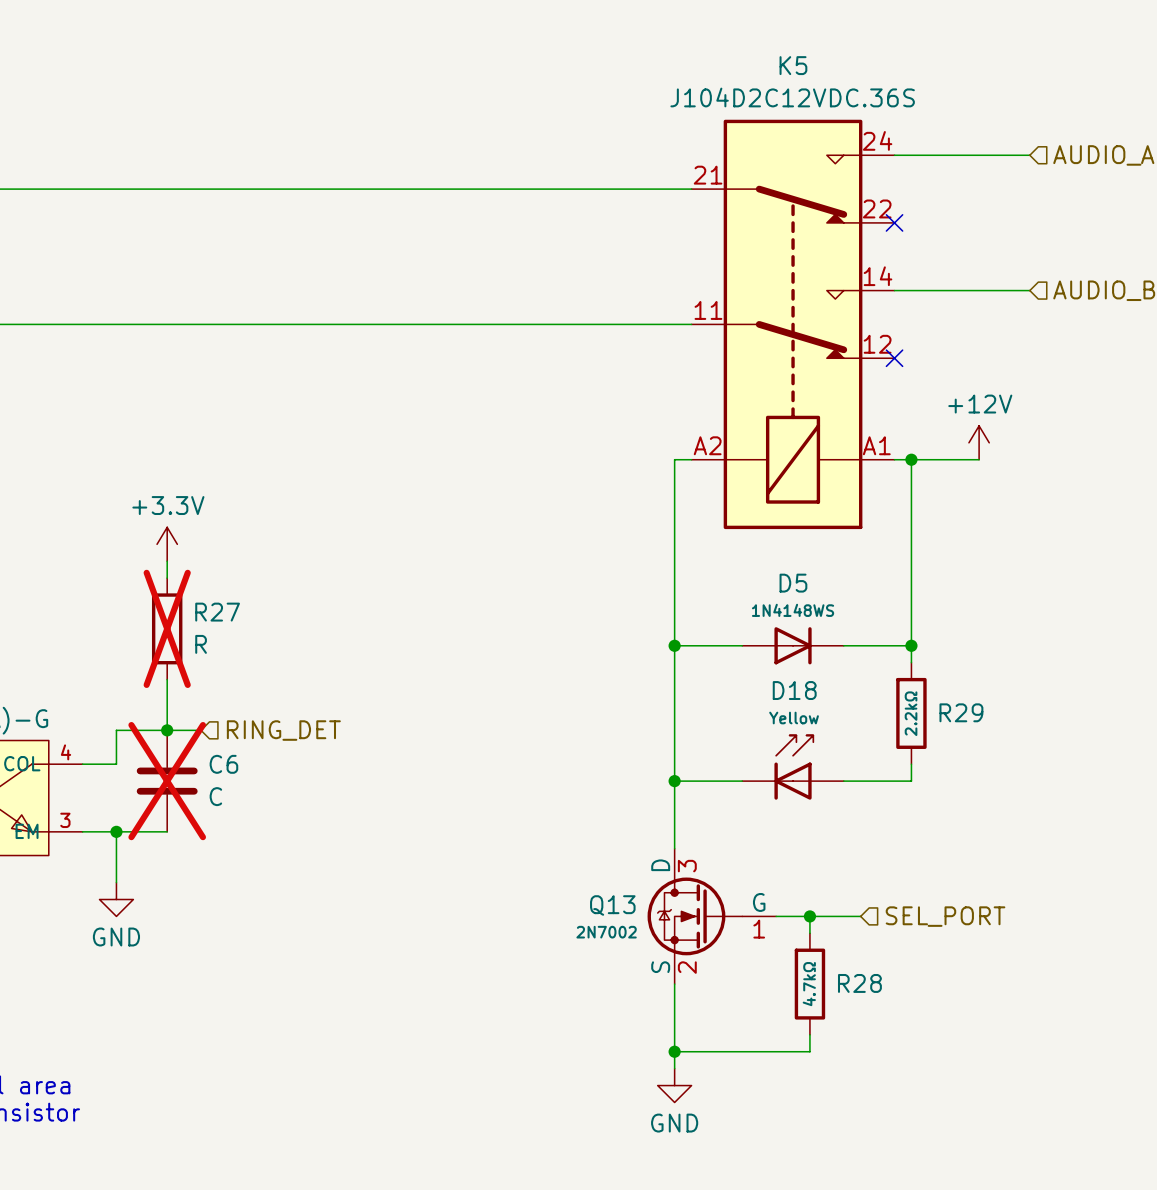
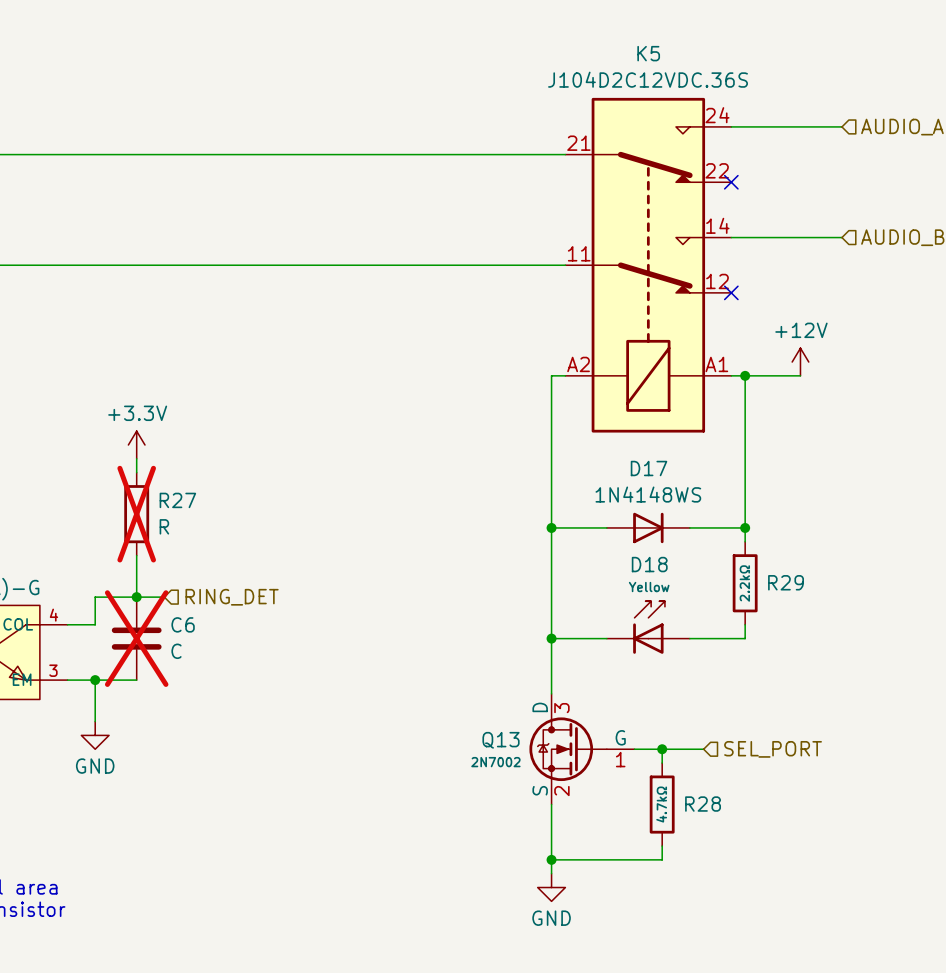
D5: 1N4148WS (793, 645) -> none
D17: none -> 1N4148WS (648, 527)

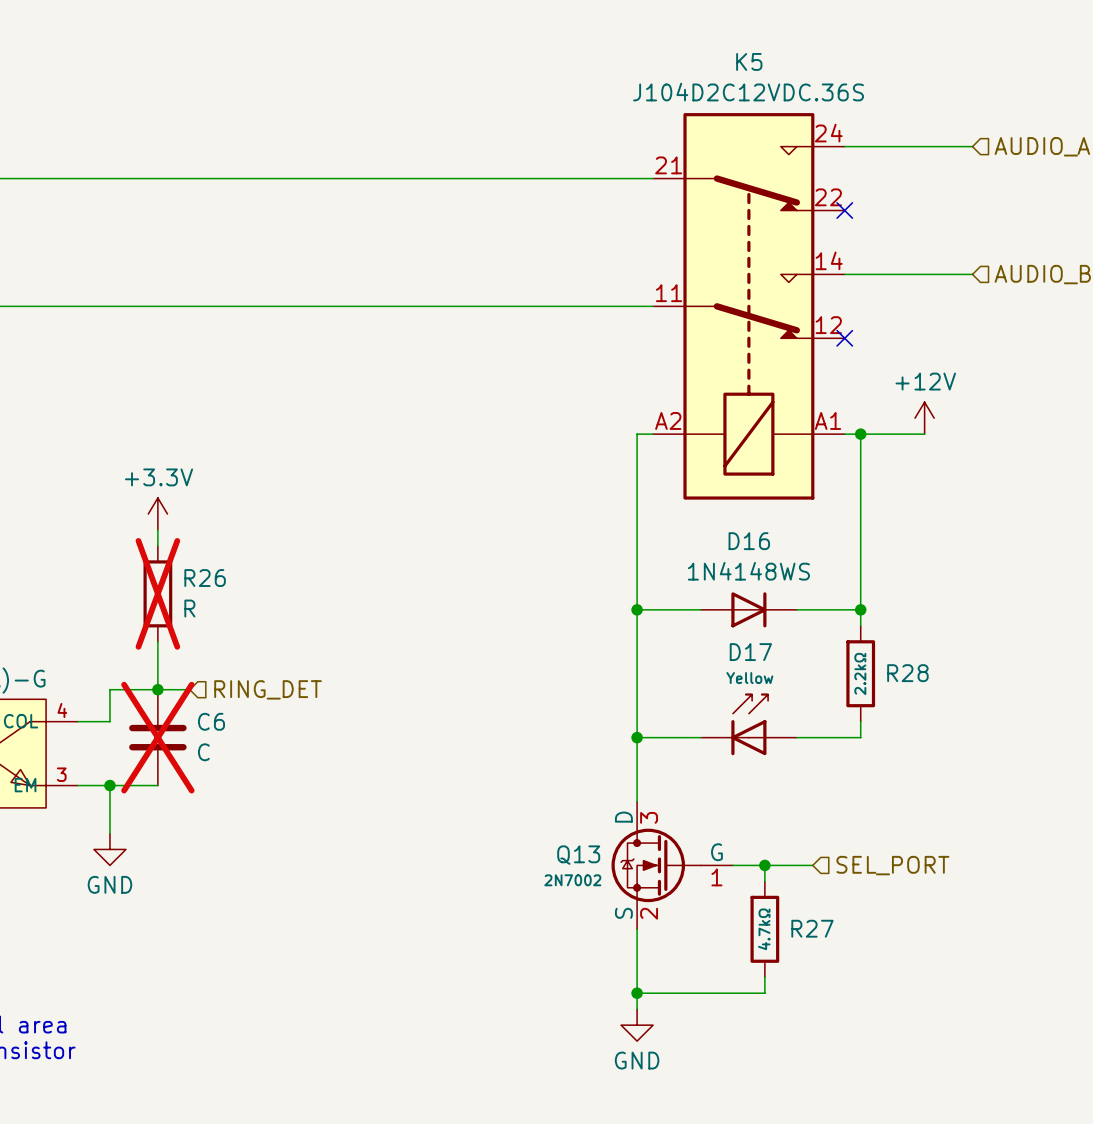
D17 name: D17 (649, 468) -> D16 (749, 541)
R27 name: R27 (177, 500) -> R26 (205, 578)
D18 name: D18 (649, 564) -> D17 (750, 652)
R29 name: R29 (786, 582) -> R28 (907, 673)
R28 name: R28 (703, 804) -> R27 (812, 928)

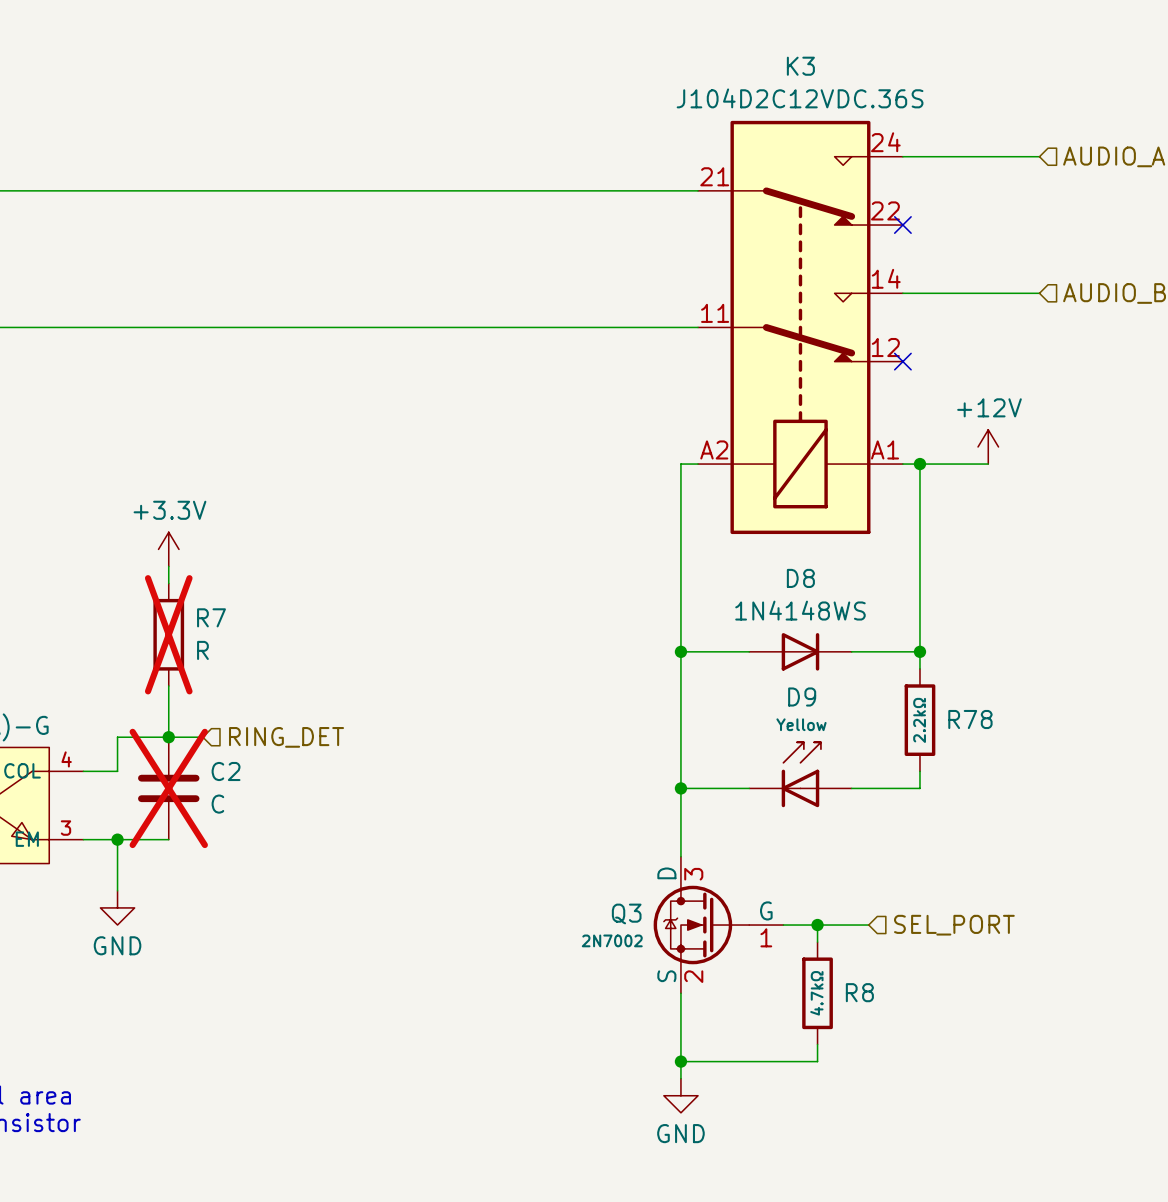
K5 name: K5 (749, 61) -> K3 (800, 66)
D16 name: D16 (749, 541) -> D8 (800, 578)
R26 name: R26 (205, 578) -> R7 (211, 617)
D17 name: D17 (750, 652) -> D9 (802, 697)
R28 name: R28 (907, 673) -> R78 (970, 719)
C6 name: C6 (211, 721) -> C2 (226, 771)
Q13 name: Q13 (578, 855) -> Q3 (626, 913)
R27 name: R27 (812, 928) -> R8 (859, 992)

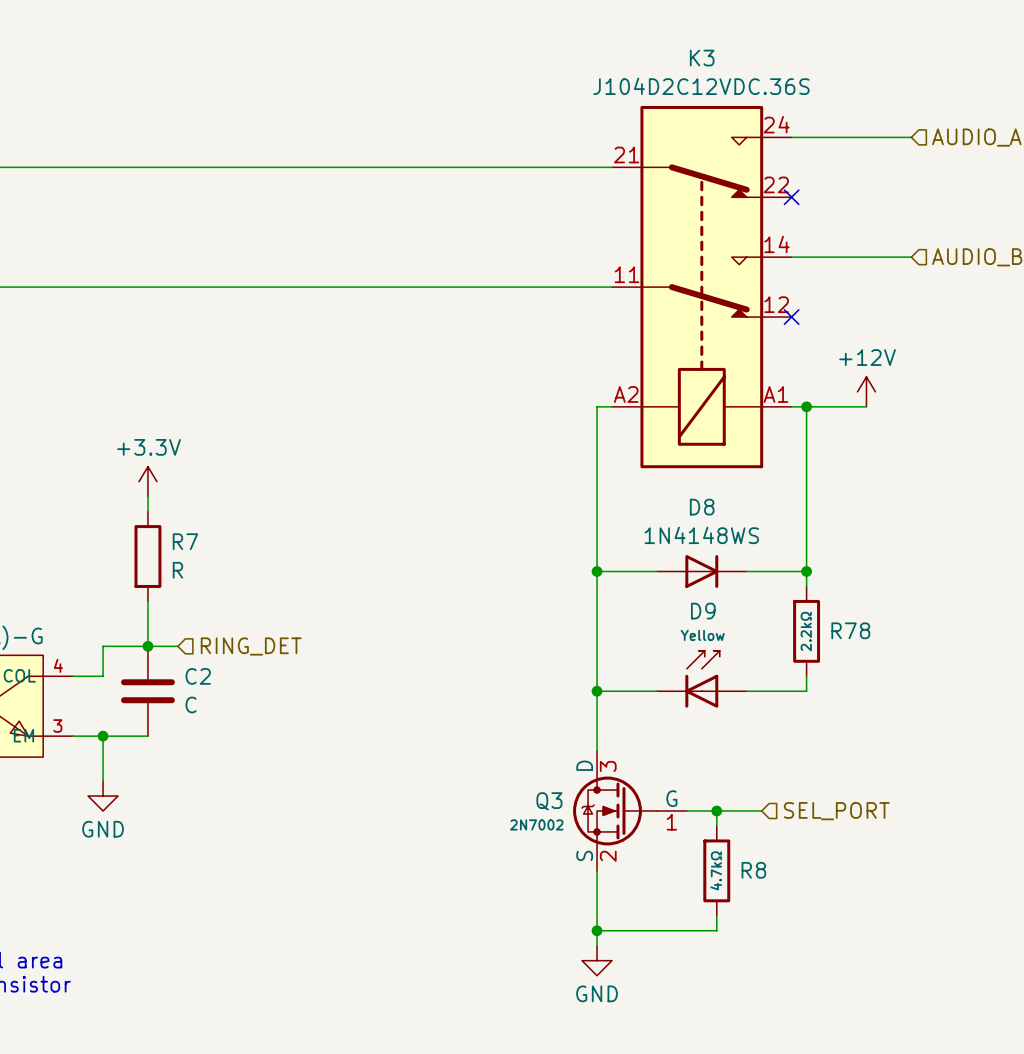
R7 do-not-place cross: (168, 634) -> none
C2 do-not-place cross: (168, 788) -> none

